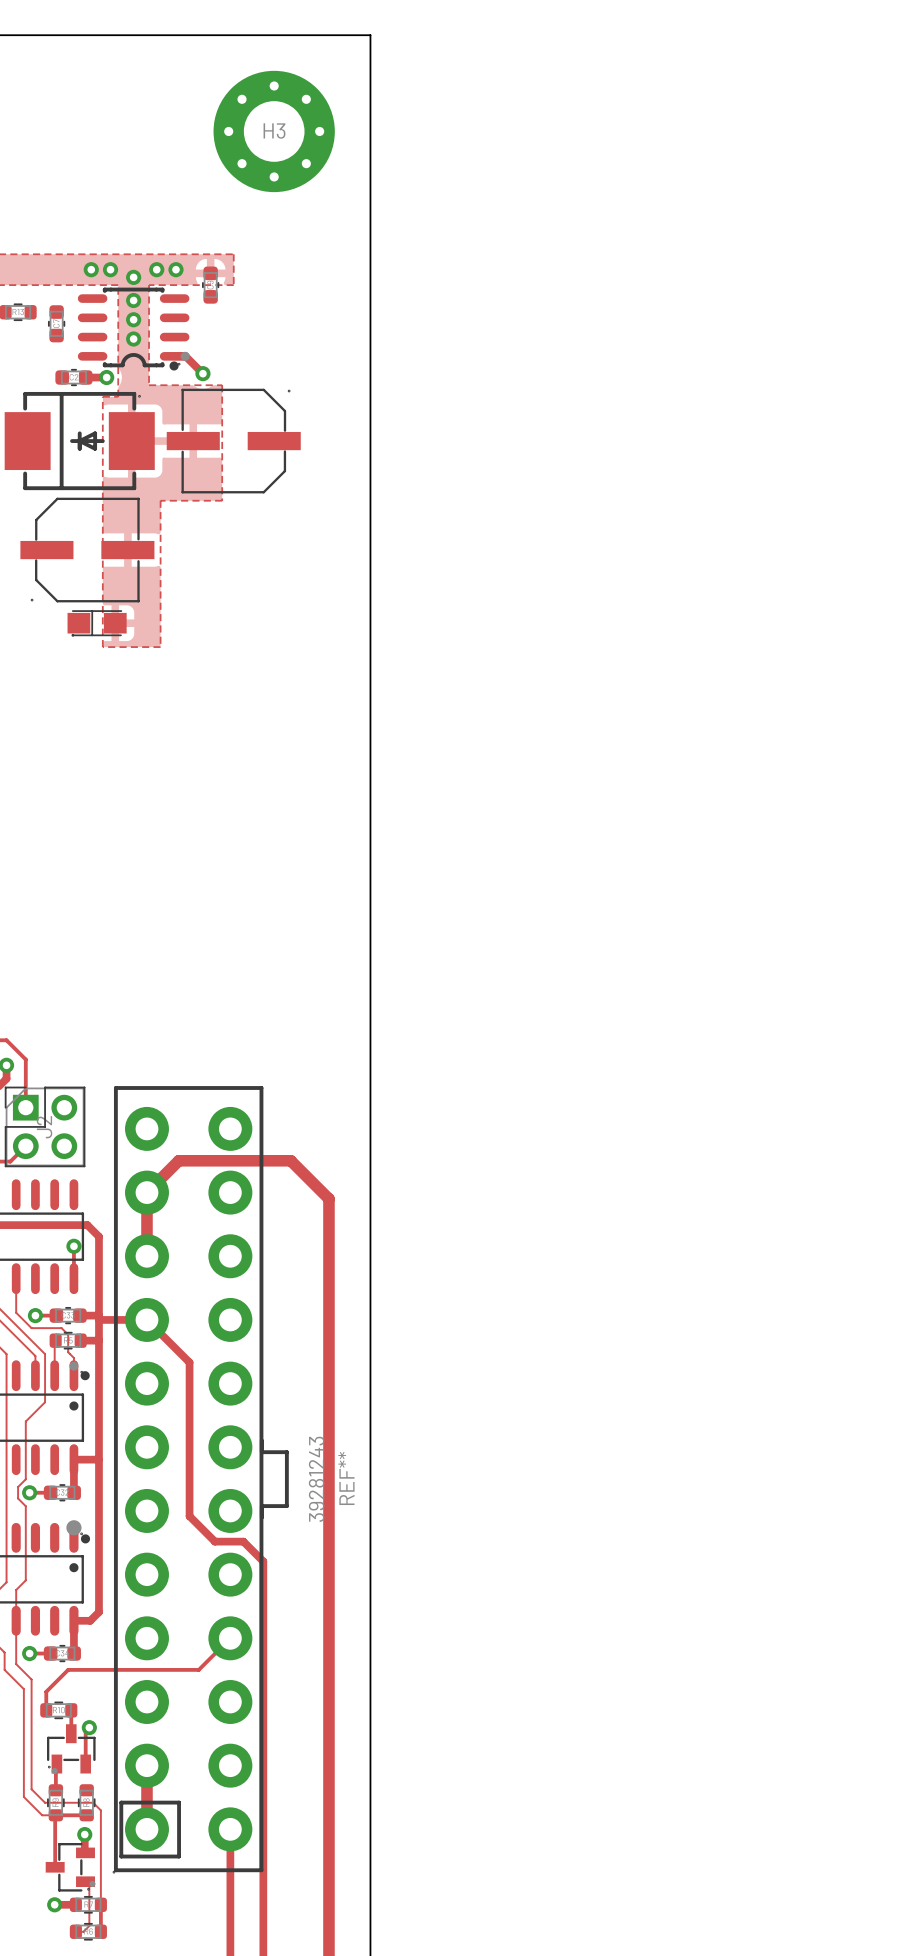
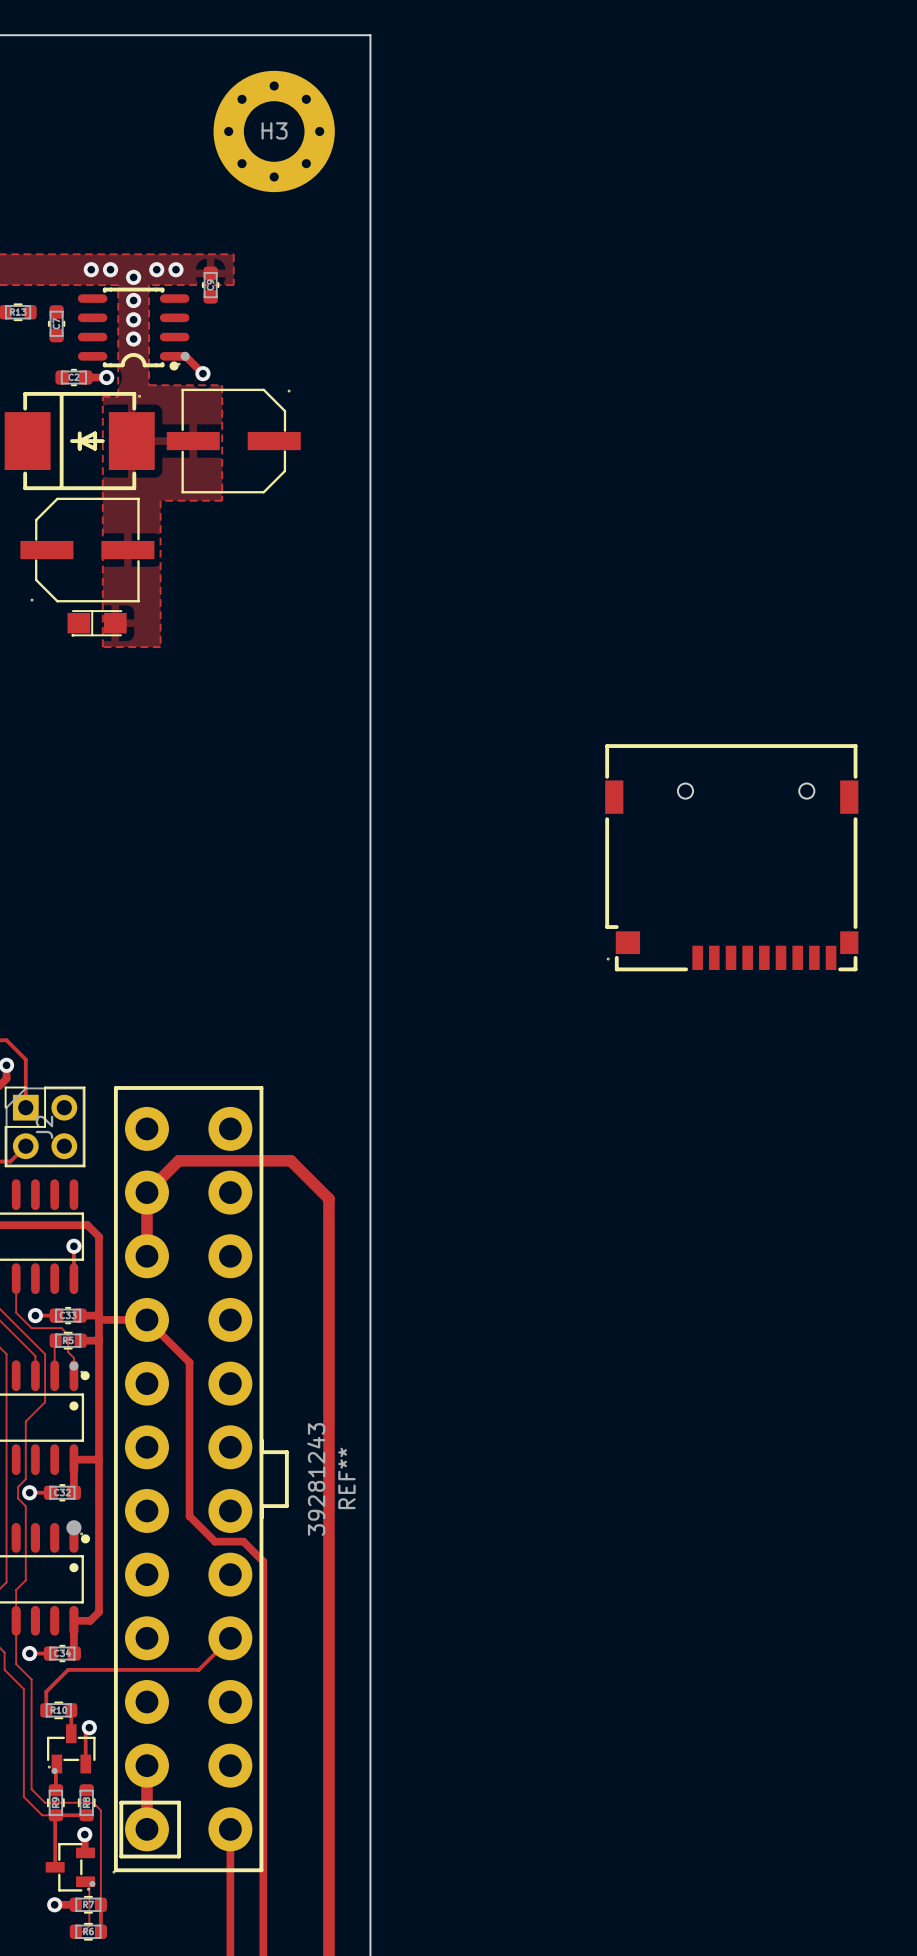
part: none -> (731, 857)

